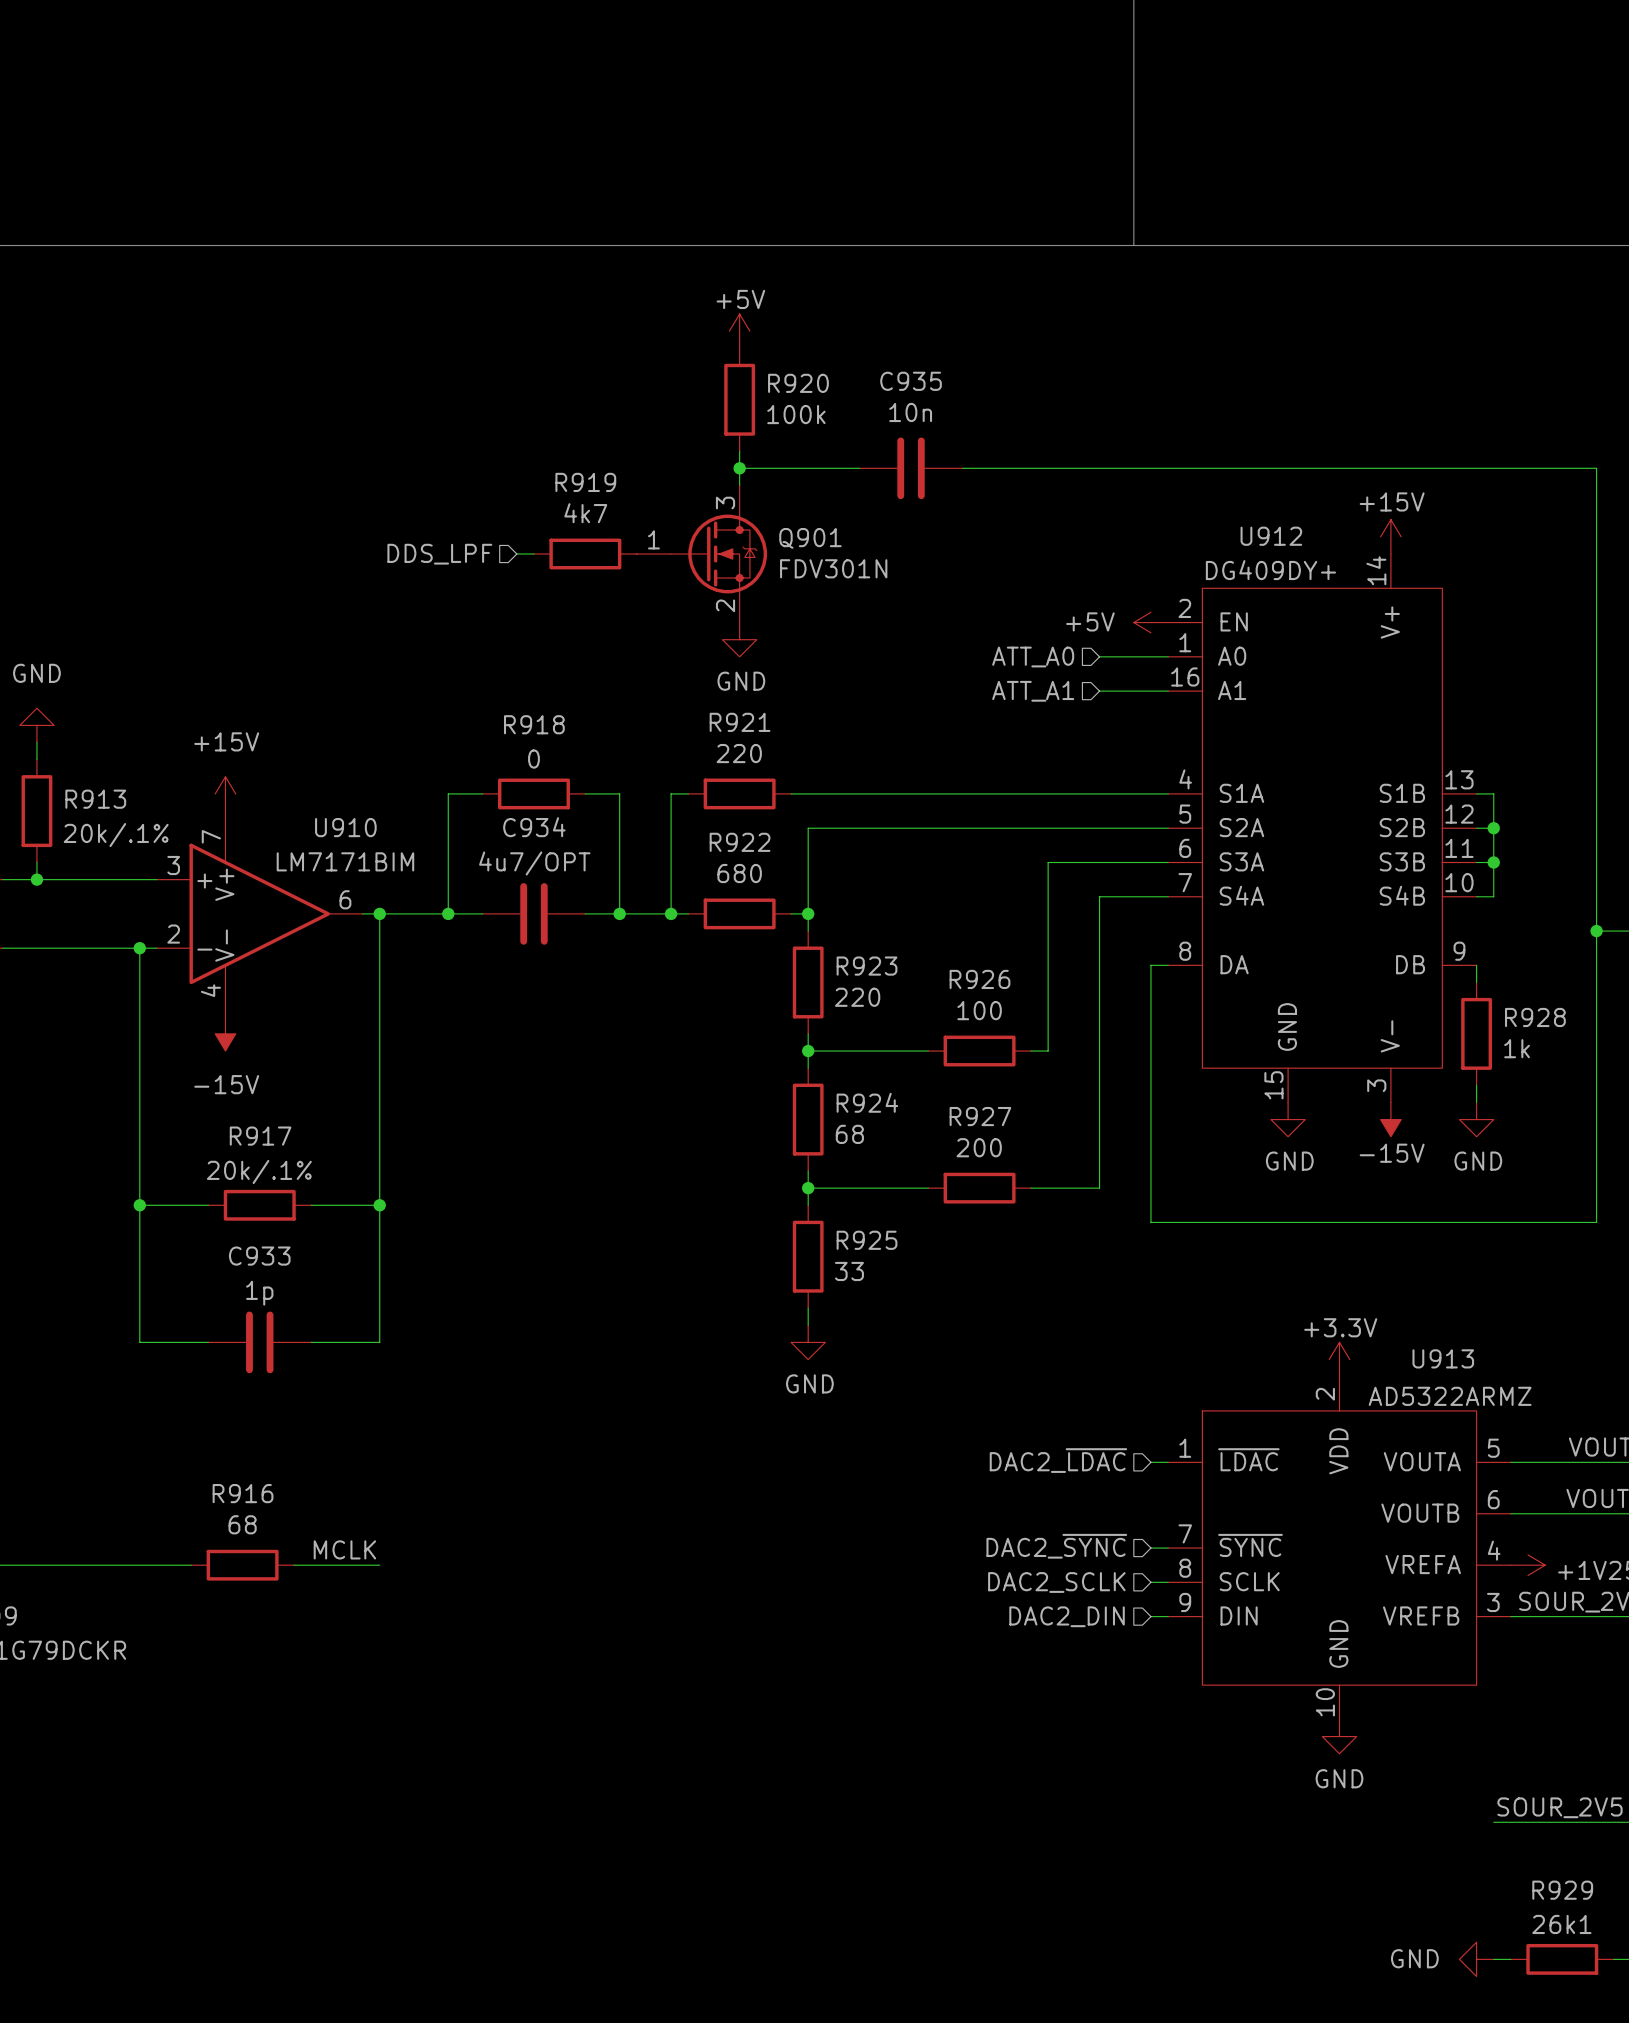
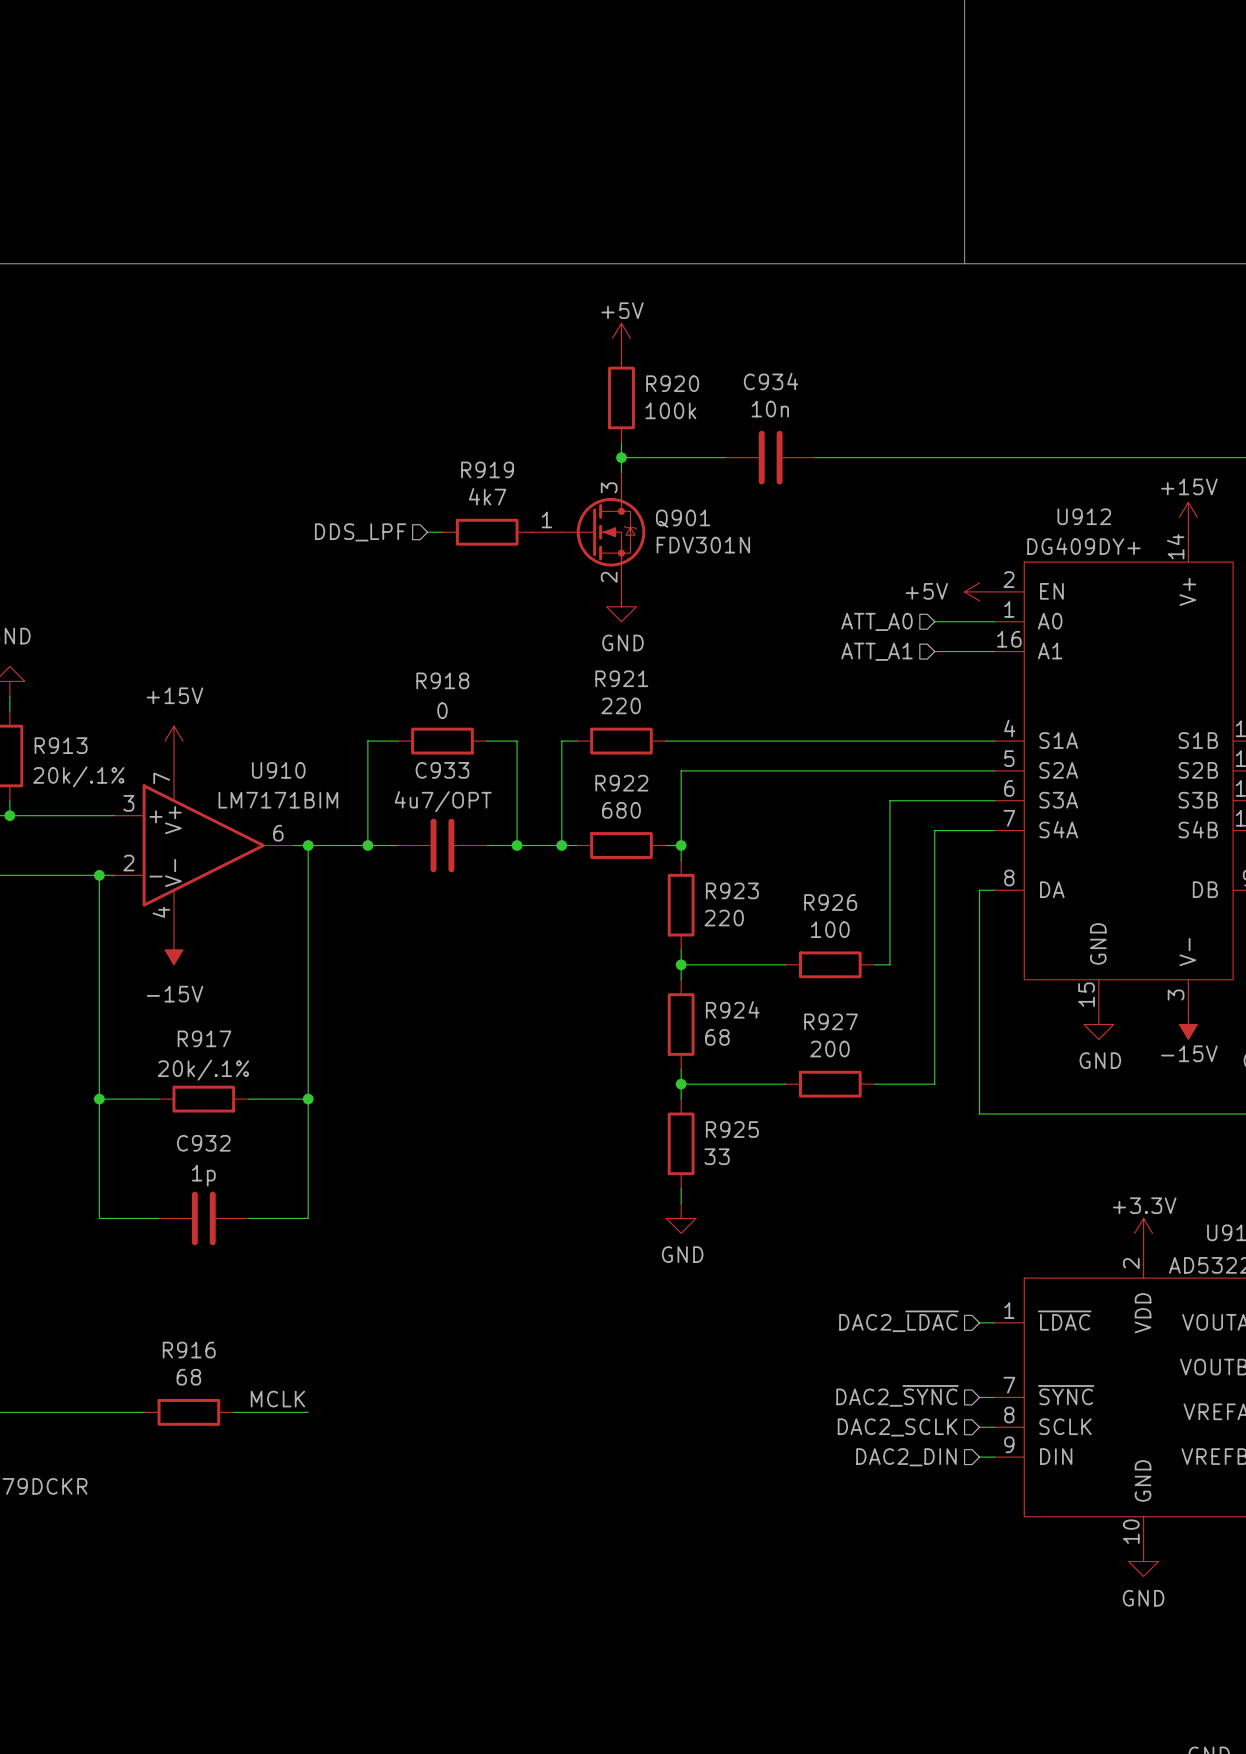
C935 name: C935 (911, 381) -> C934 (771, 381)
C934 name: C934 (534, 827) -> C933 (442, 770)
C933 name: C933 (259, 1256) -> C932 (203, 1143)

